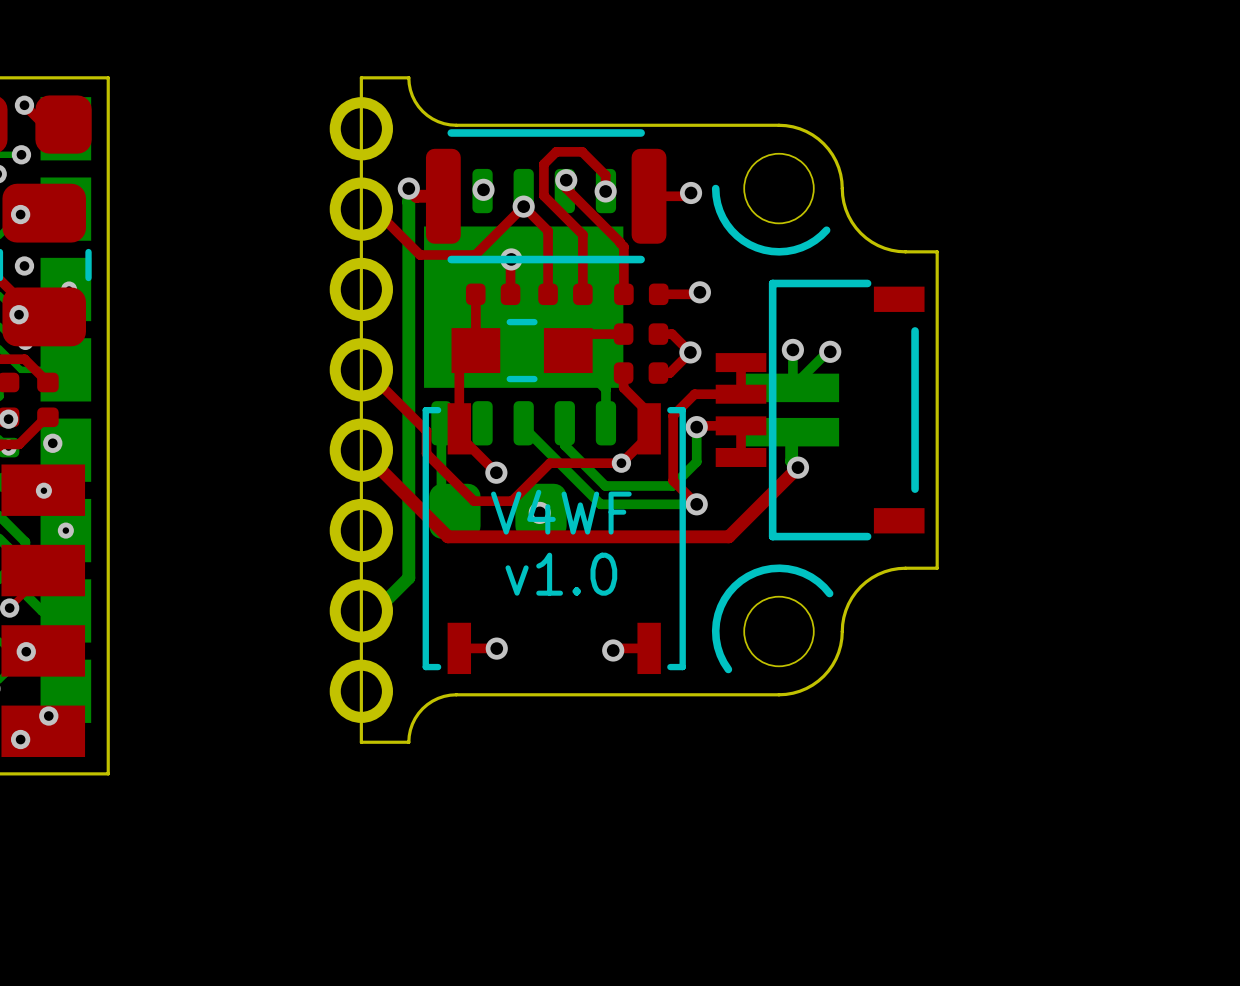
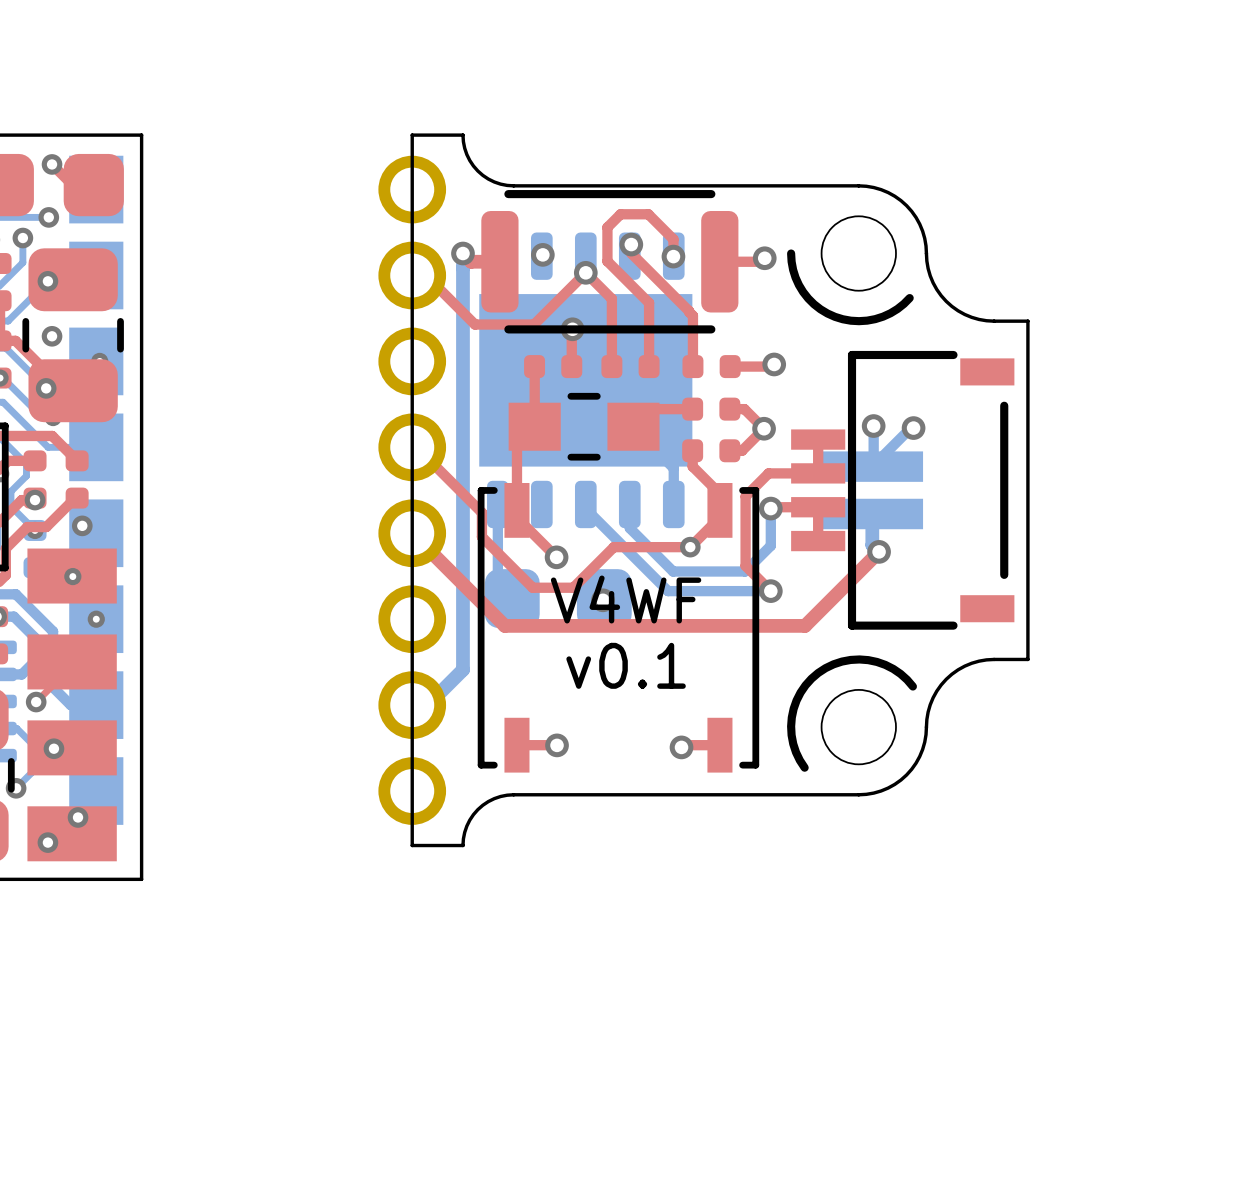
text: v1.0 (561, 574) -> v0.1 (626, 665)

